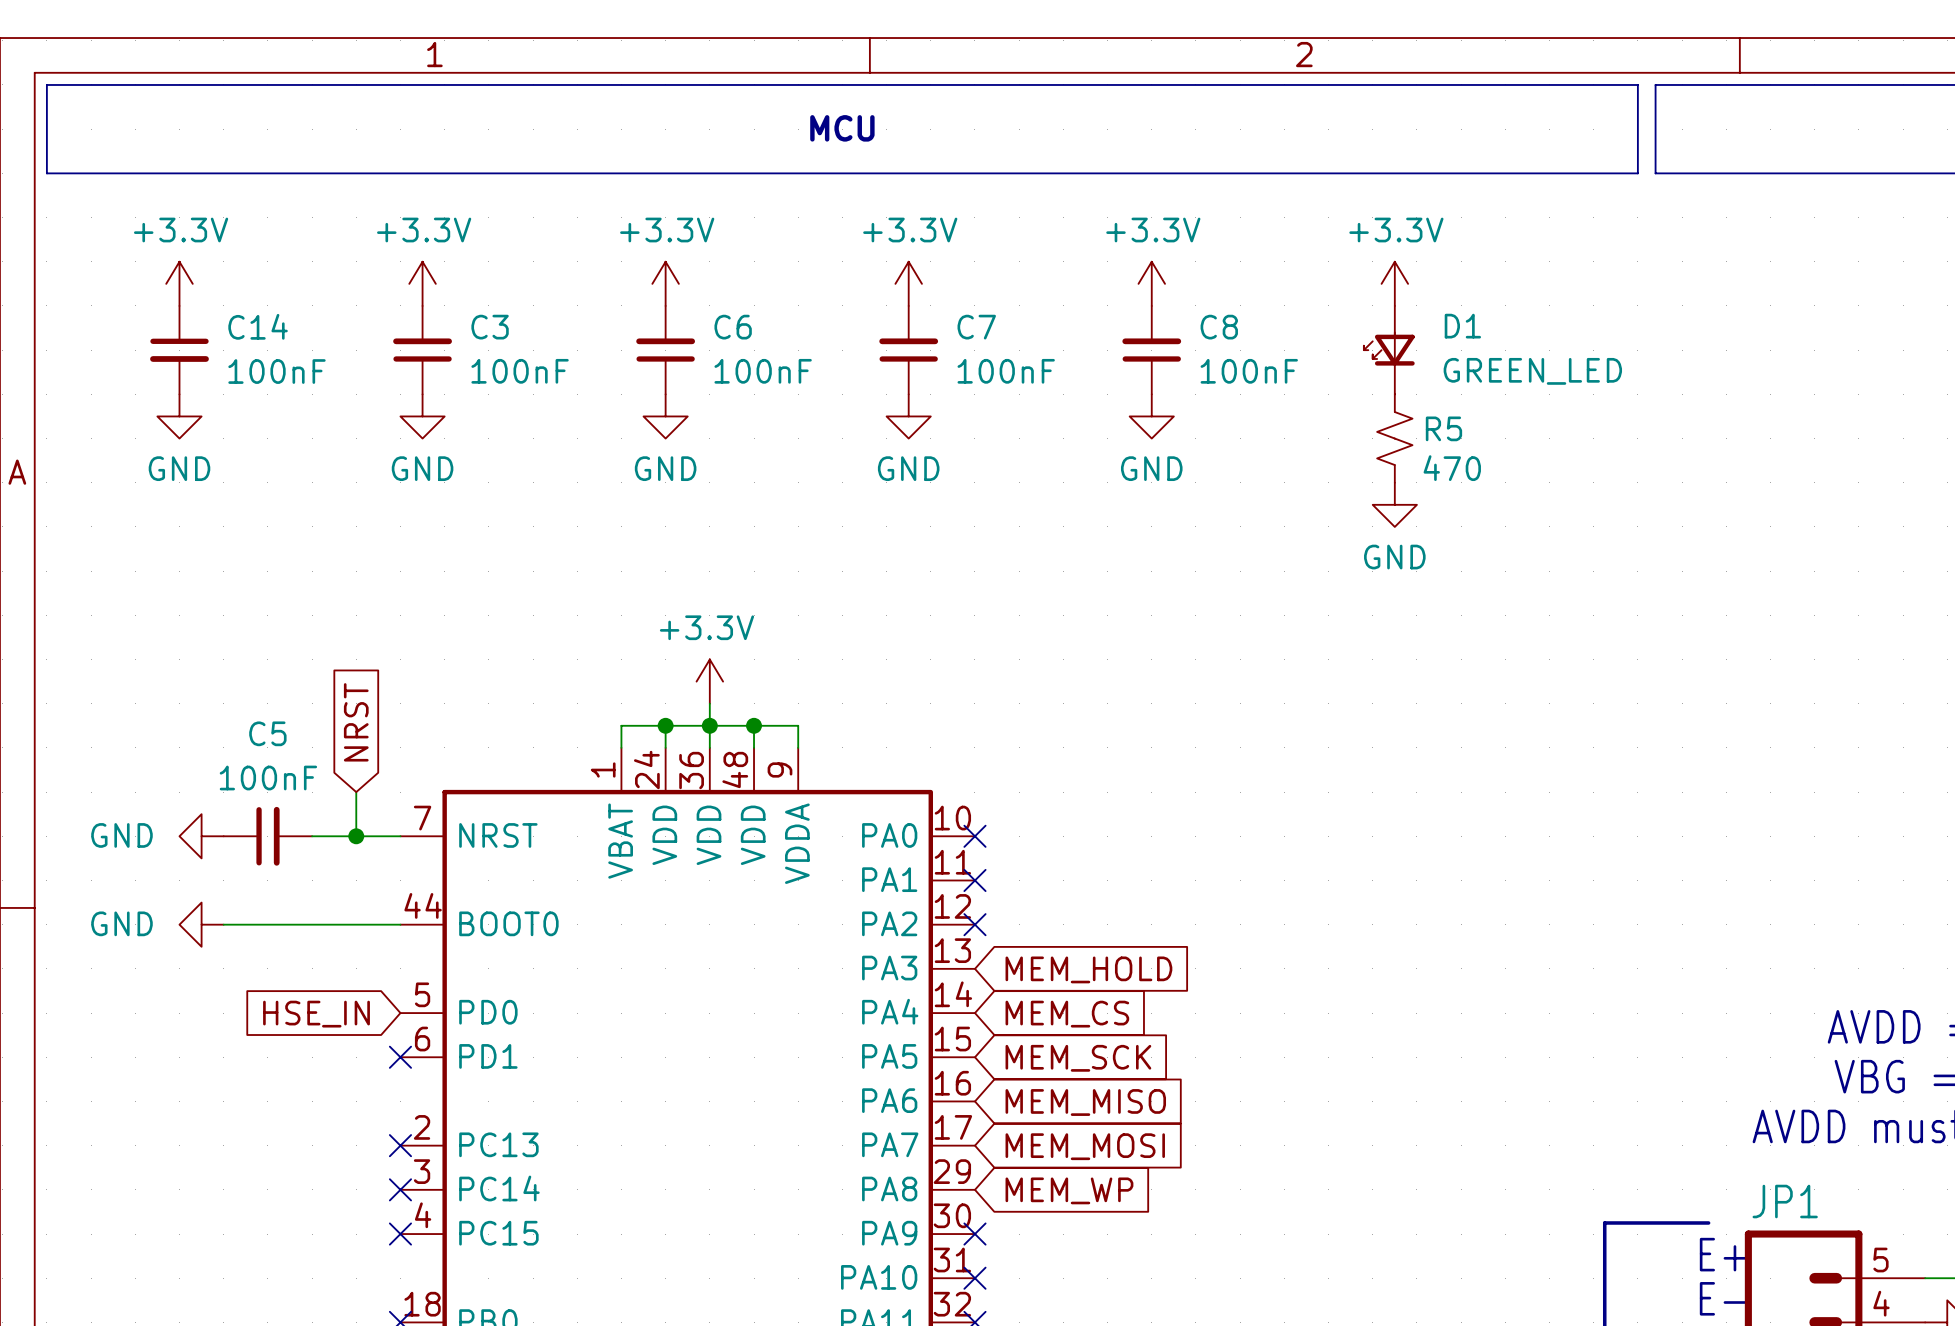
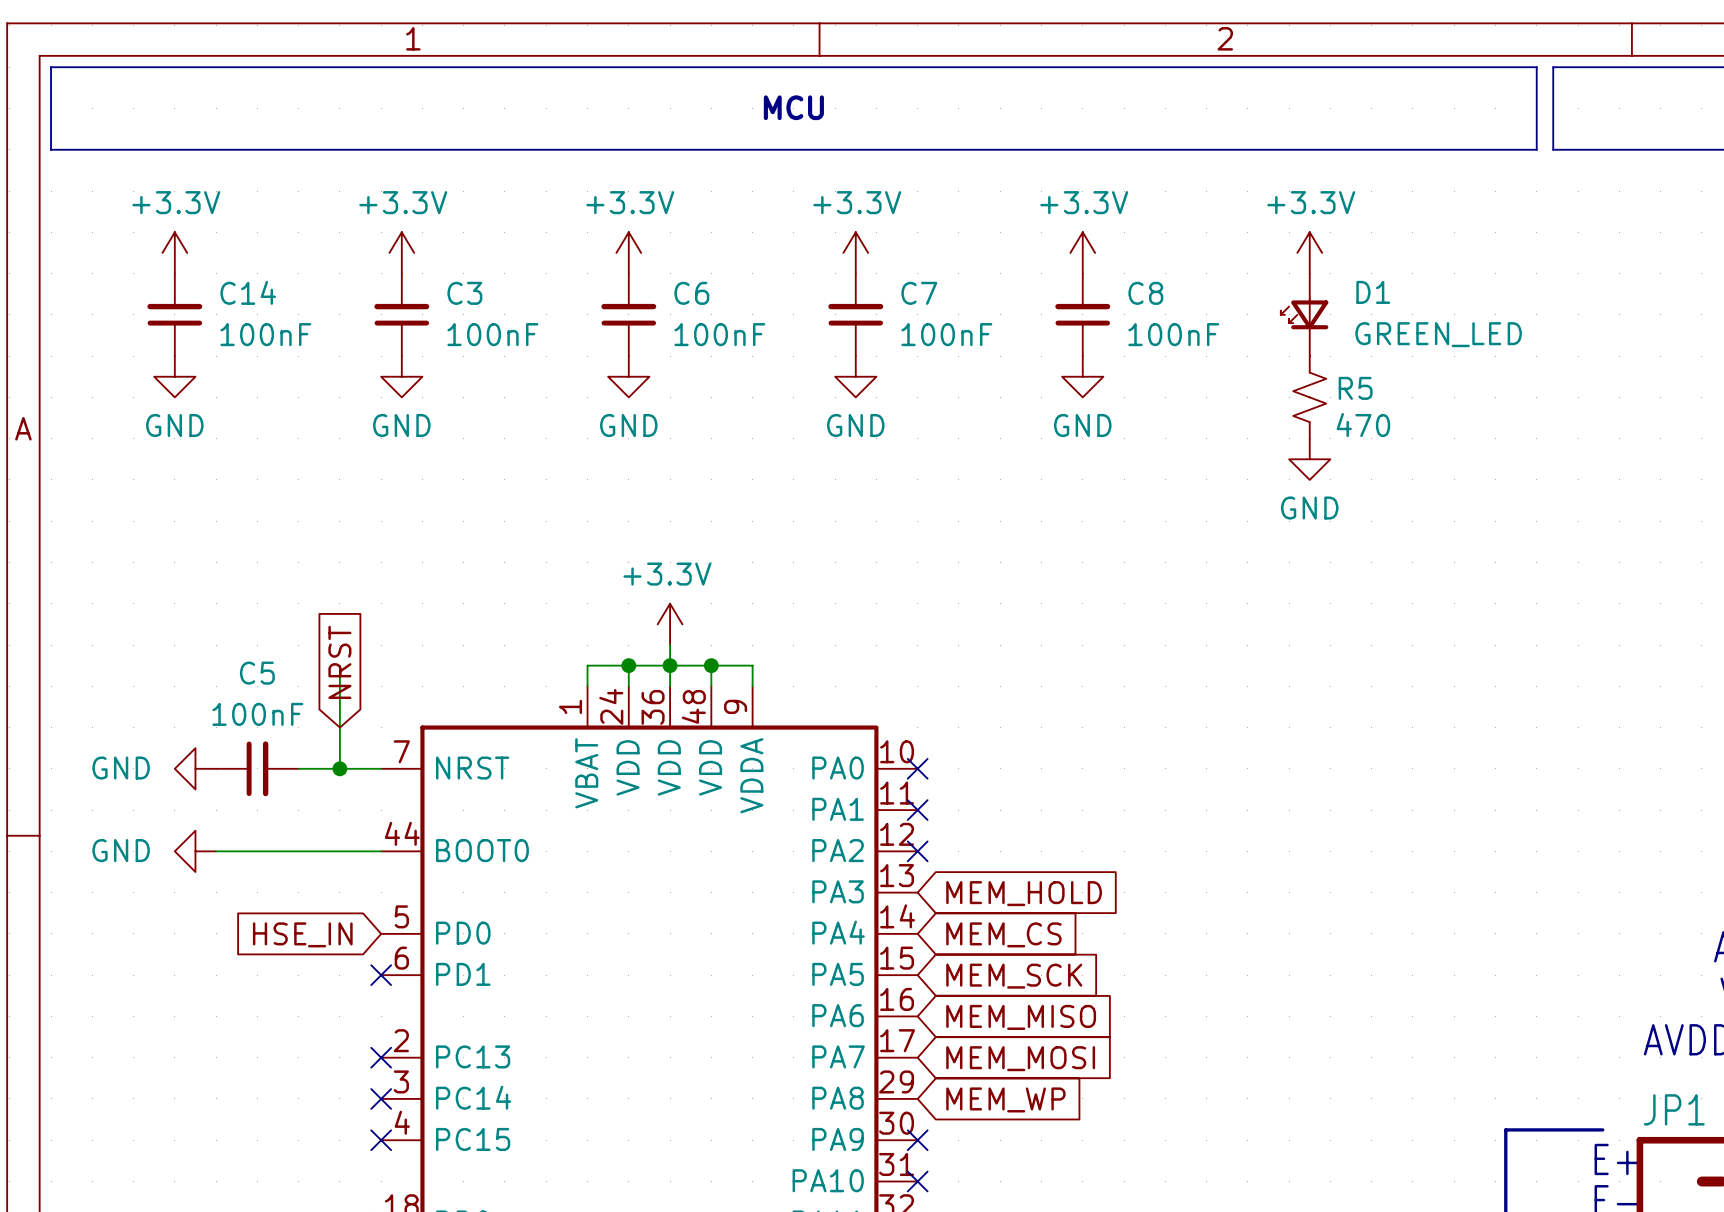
C14 rotation: 0° (179, 350) -> 180° (174, 314)
wire: none -> (339, 665) (339, 727)

